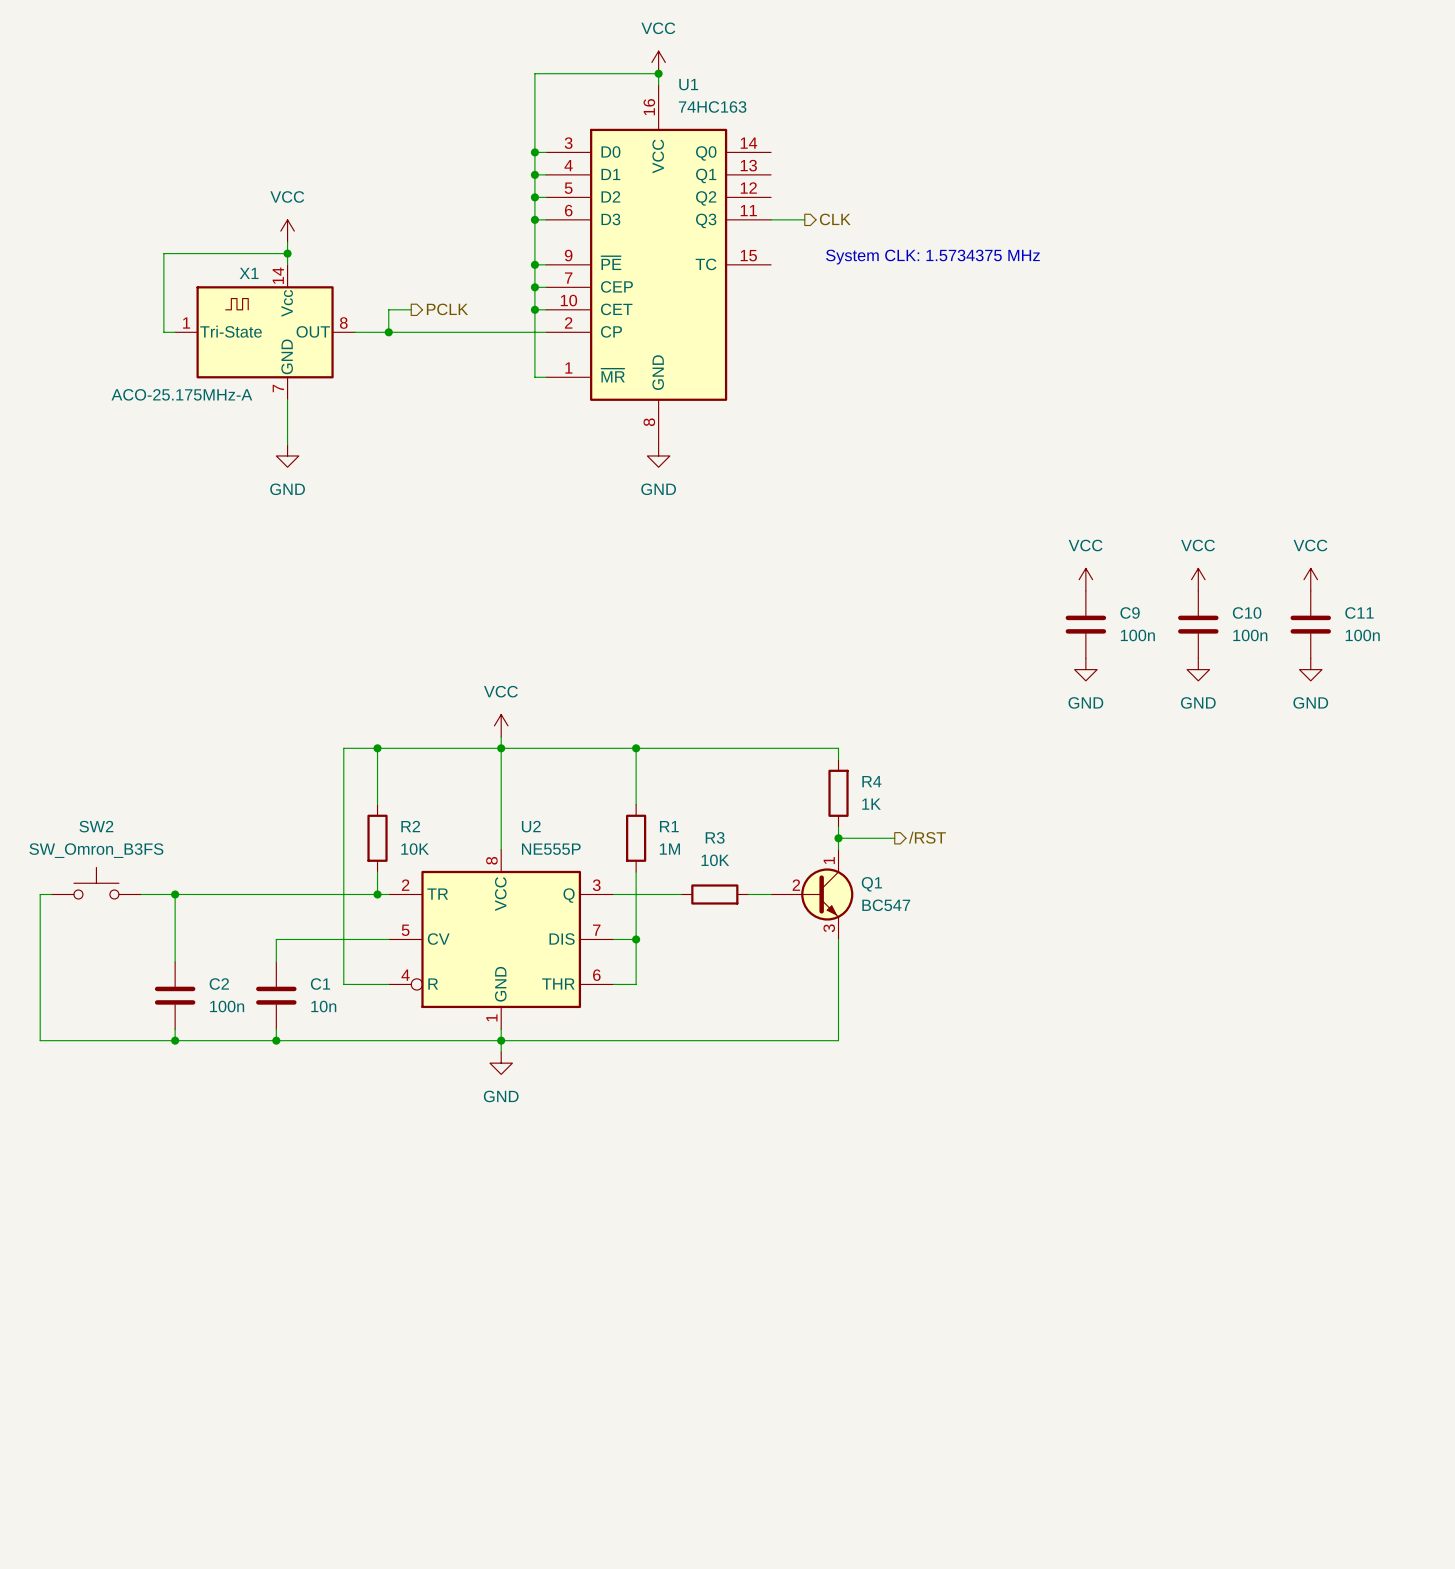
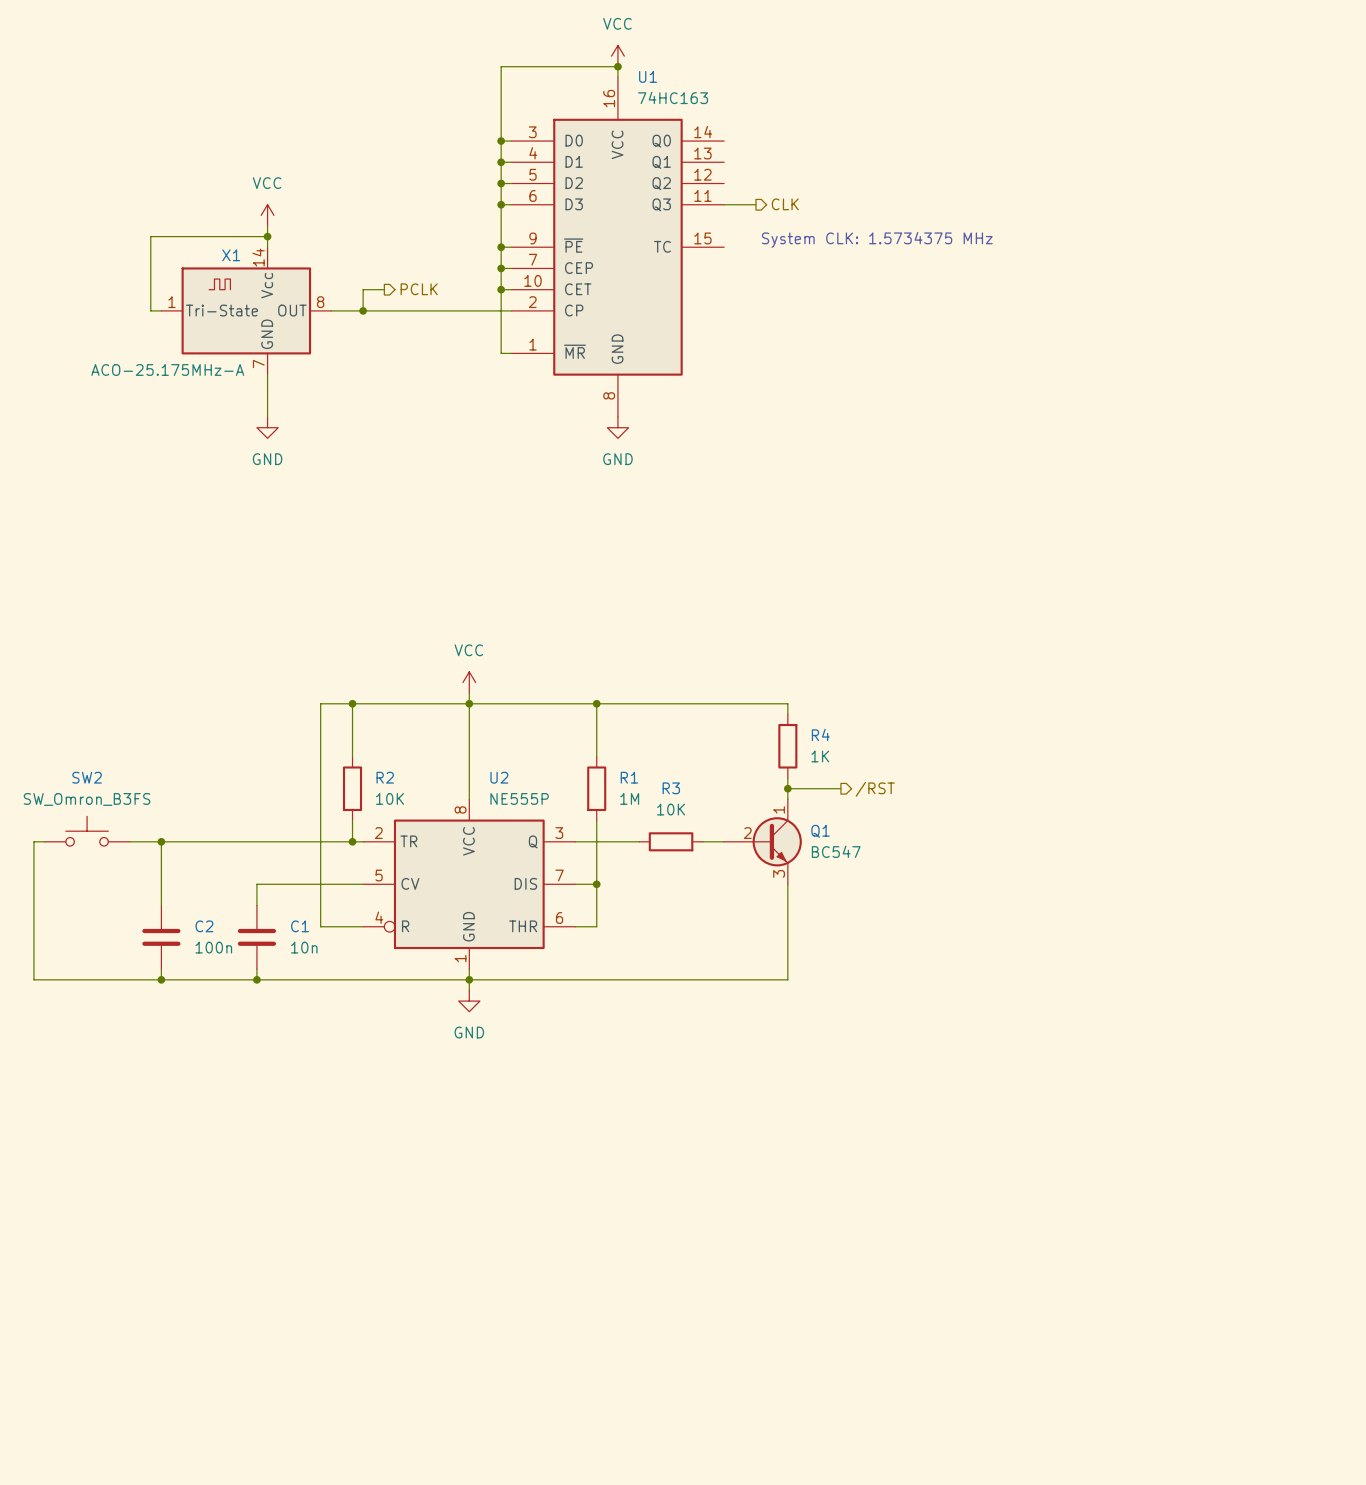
power symbol: VCC (1085, 579) -> none
power symbol: VCC (1198, 579) -> none
power symbol: VCC (1310, 579) -> none
C9: 100n (1085, 624) -> none
C10: 100n (1198, 624) -> none
C11: 100n (1310, 624) -> none
power symbol: GND (1085, 669) -> none
power symbol: GND (1198, 669) -> none
power symbol: GND (1310, 669) -> none

